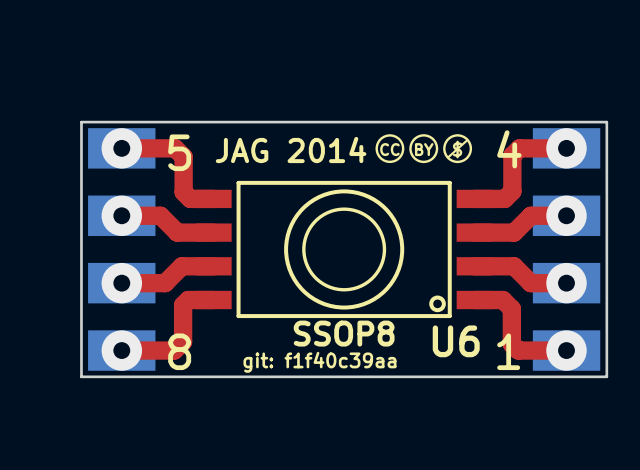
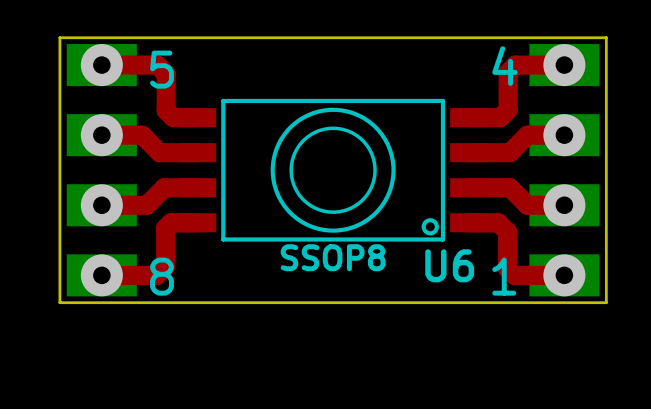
drawing: [375, 134, 473, 164] -> none
text: JAG 2014 (291, 149) -> none
text: git: f1f40c39aa (319, 362) -> none

